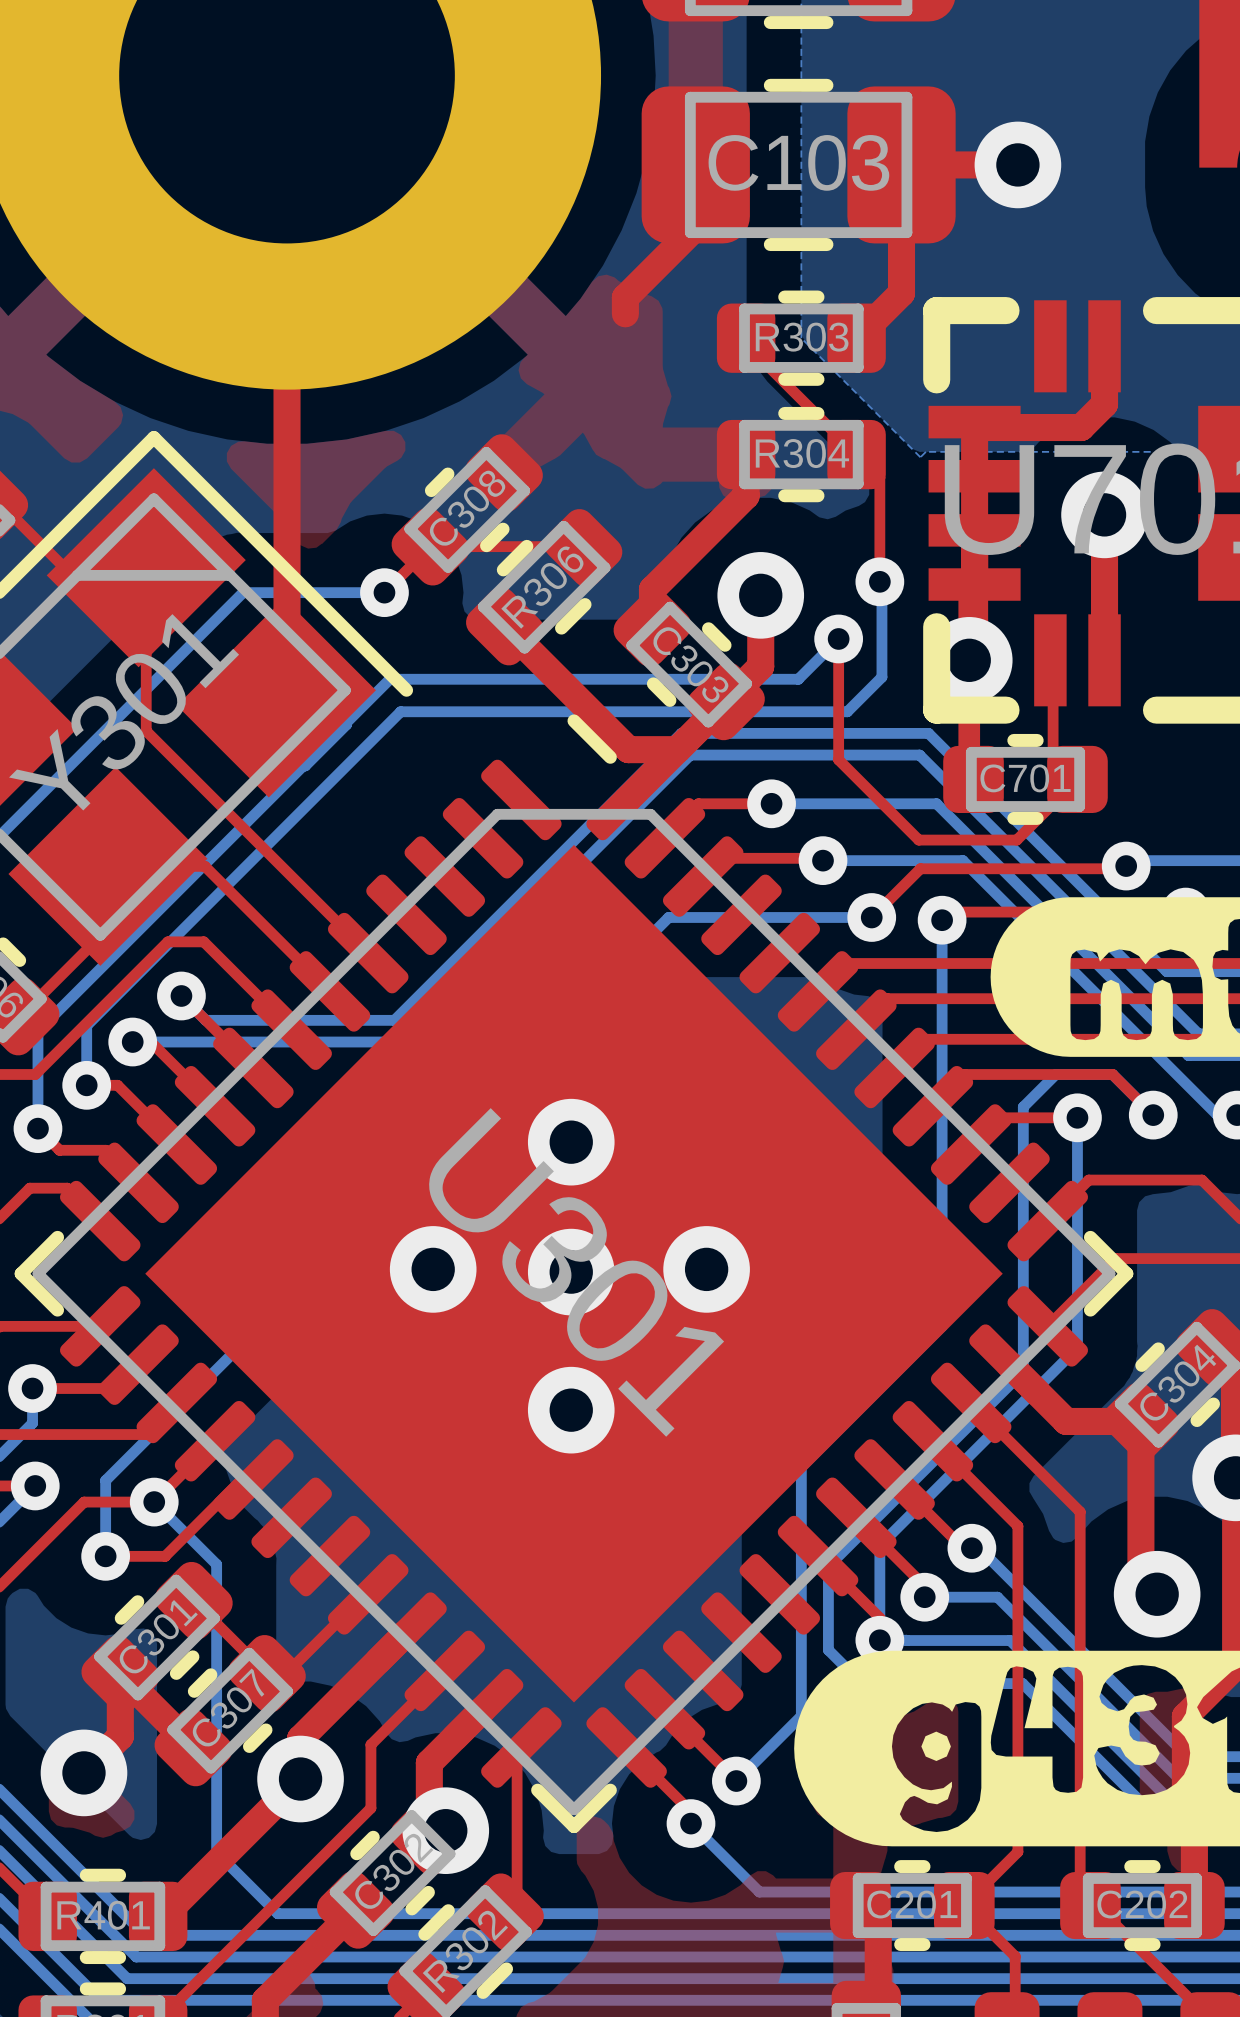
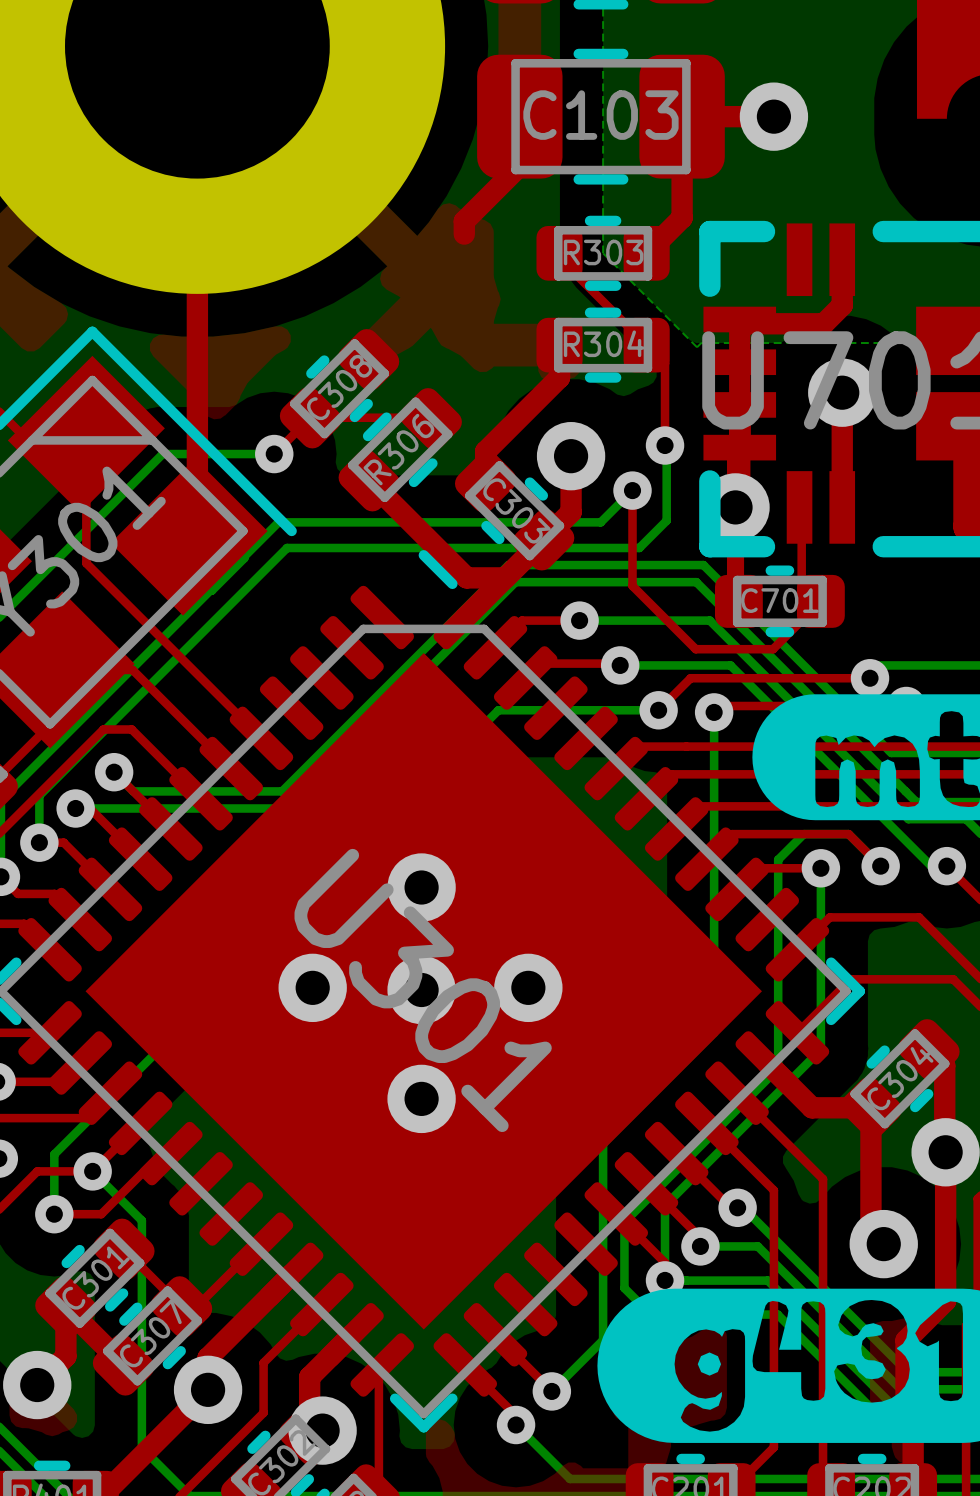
top track: (1126, 866) (1123, 868) (920, 868) (912, 876) -> (870, 678) (690, 678)
via position: (1126, 866) -> (870, 678)

